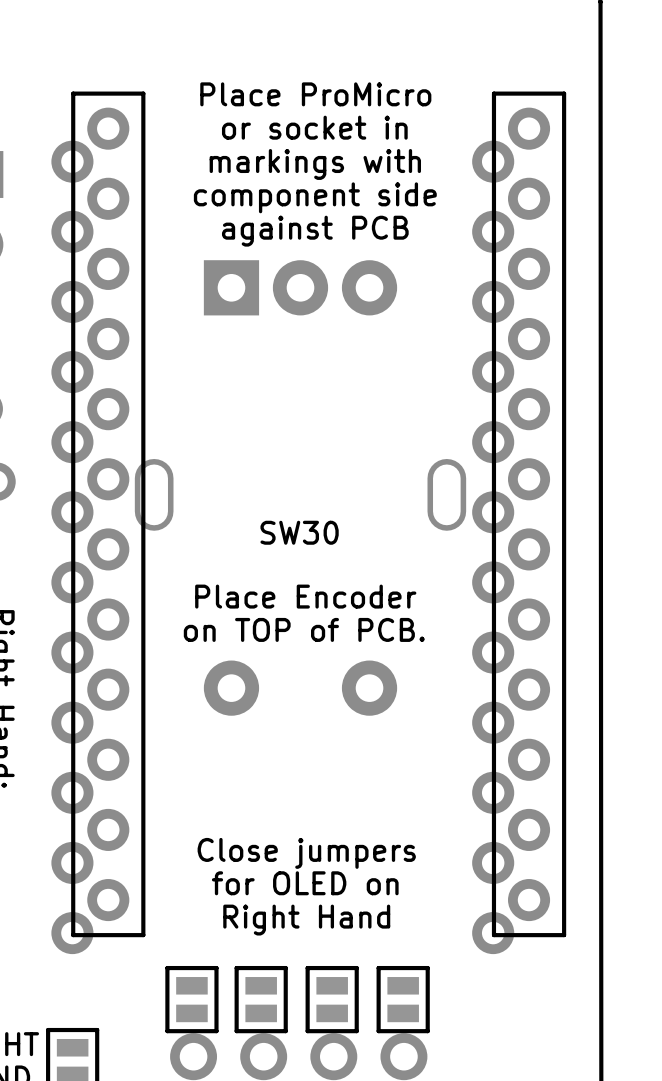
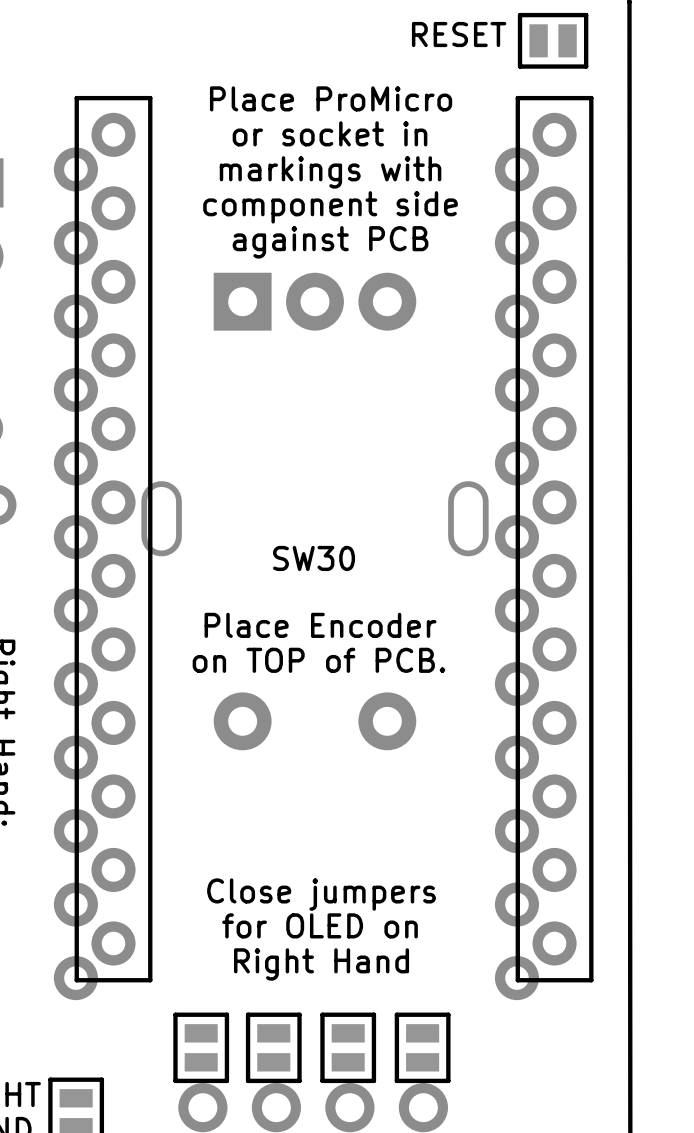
text: none -> RESET (459, 34)
part: none -> (553, 40)

